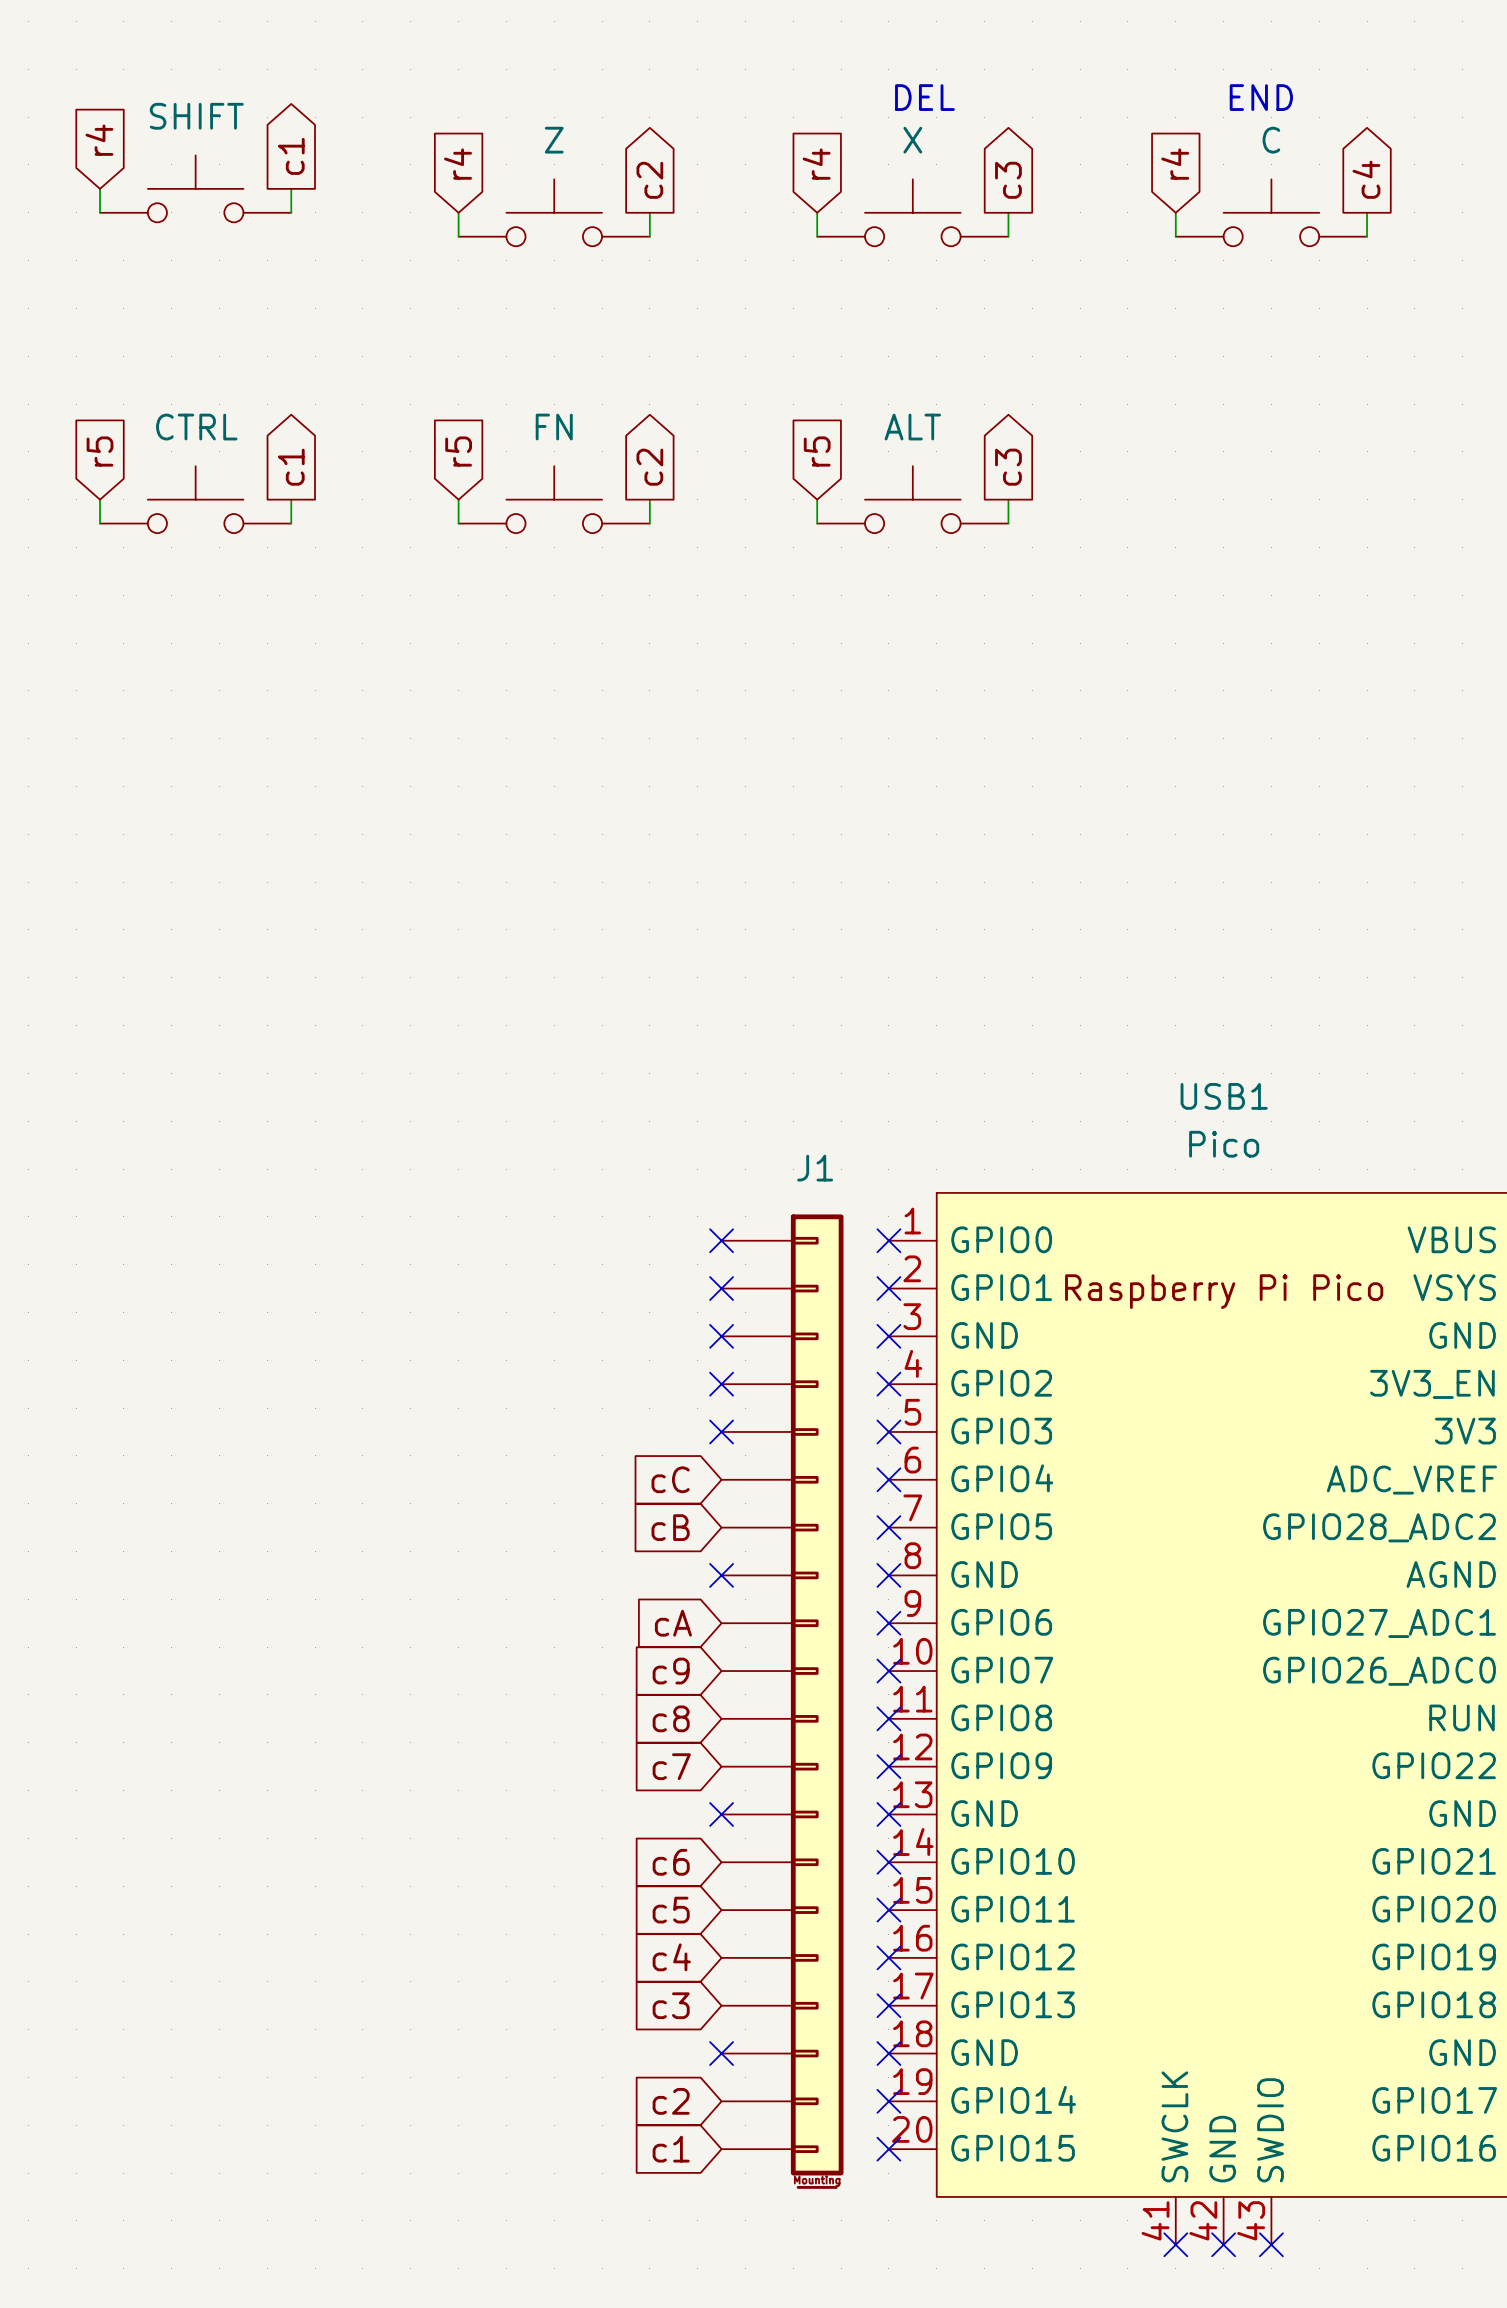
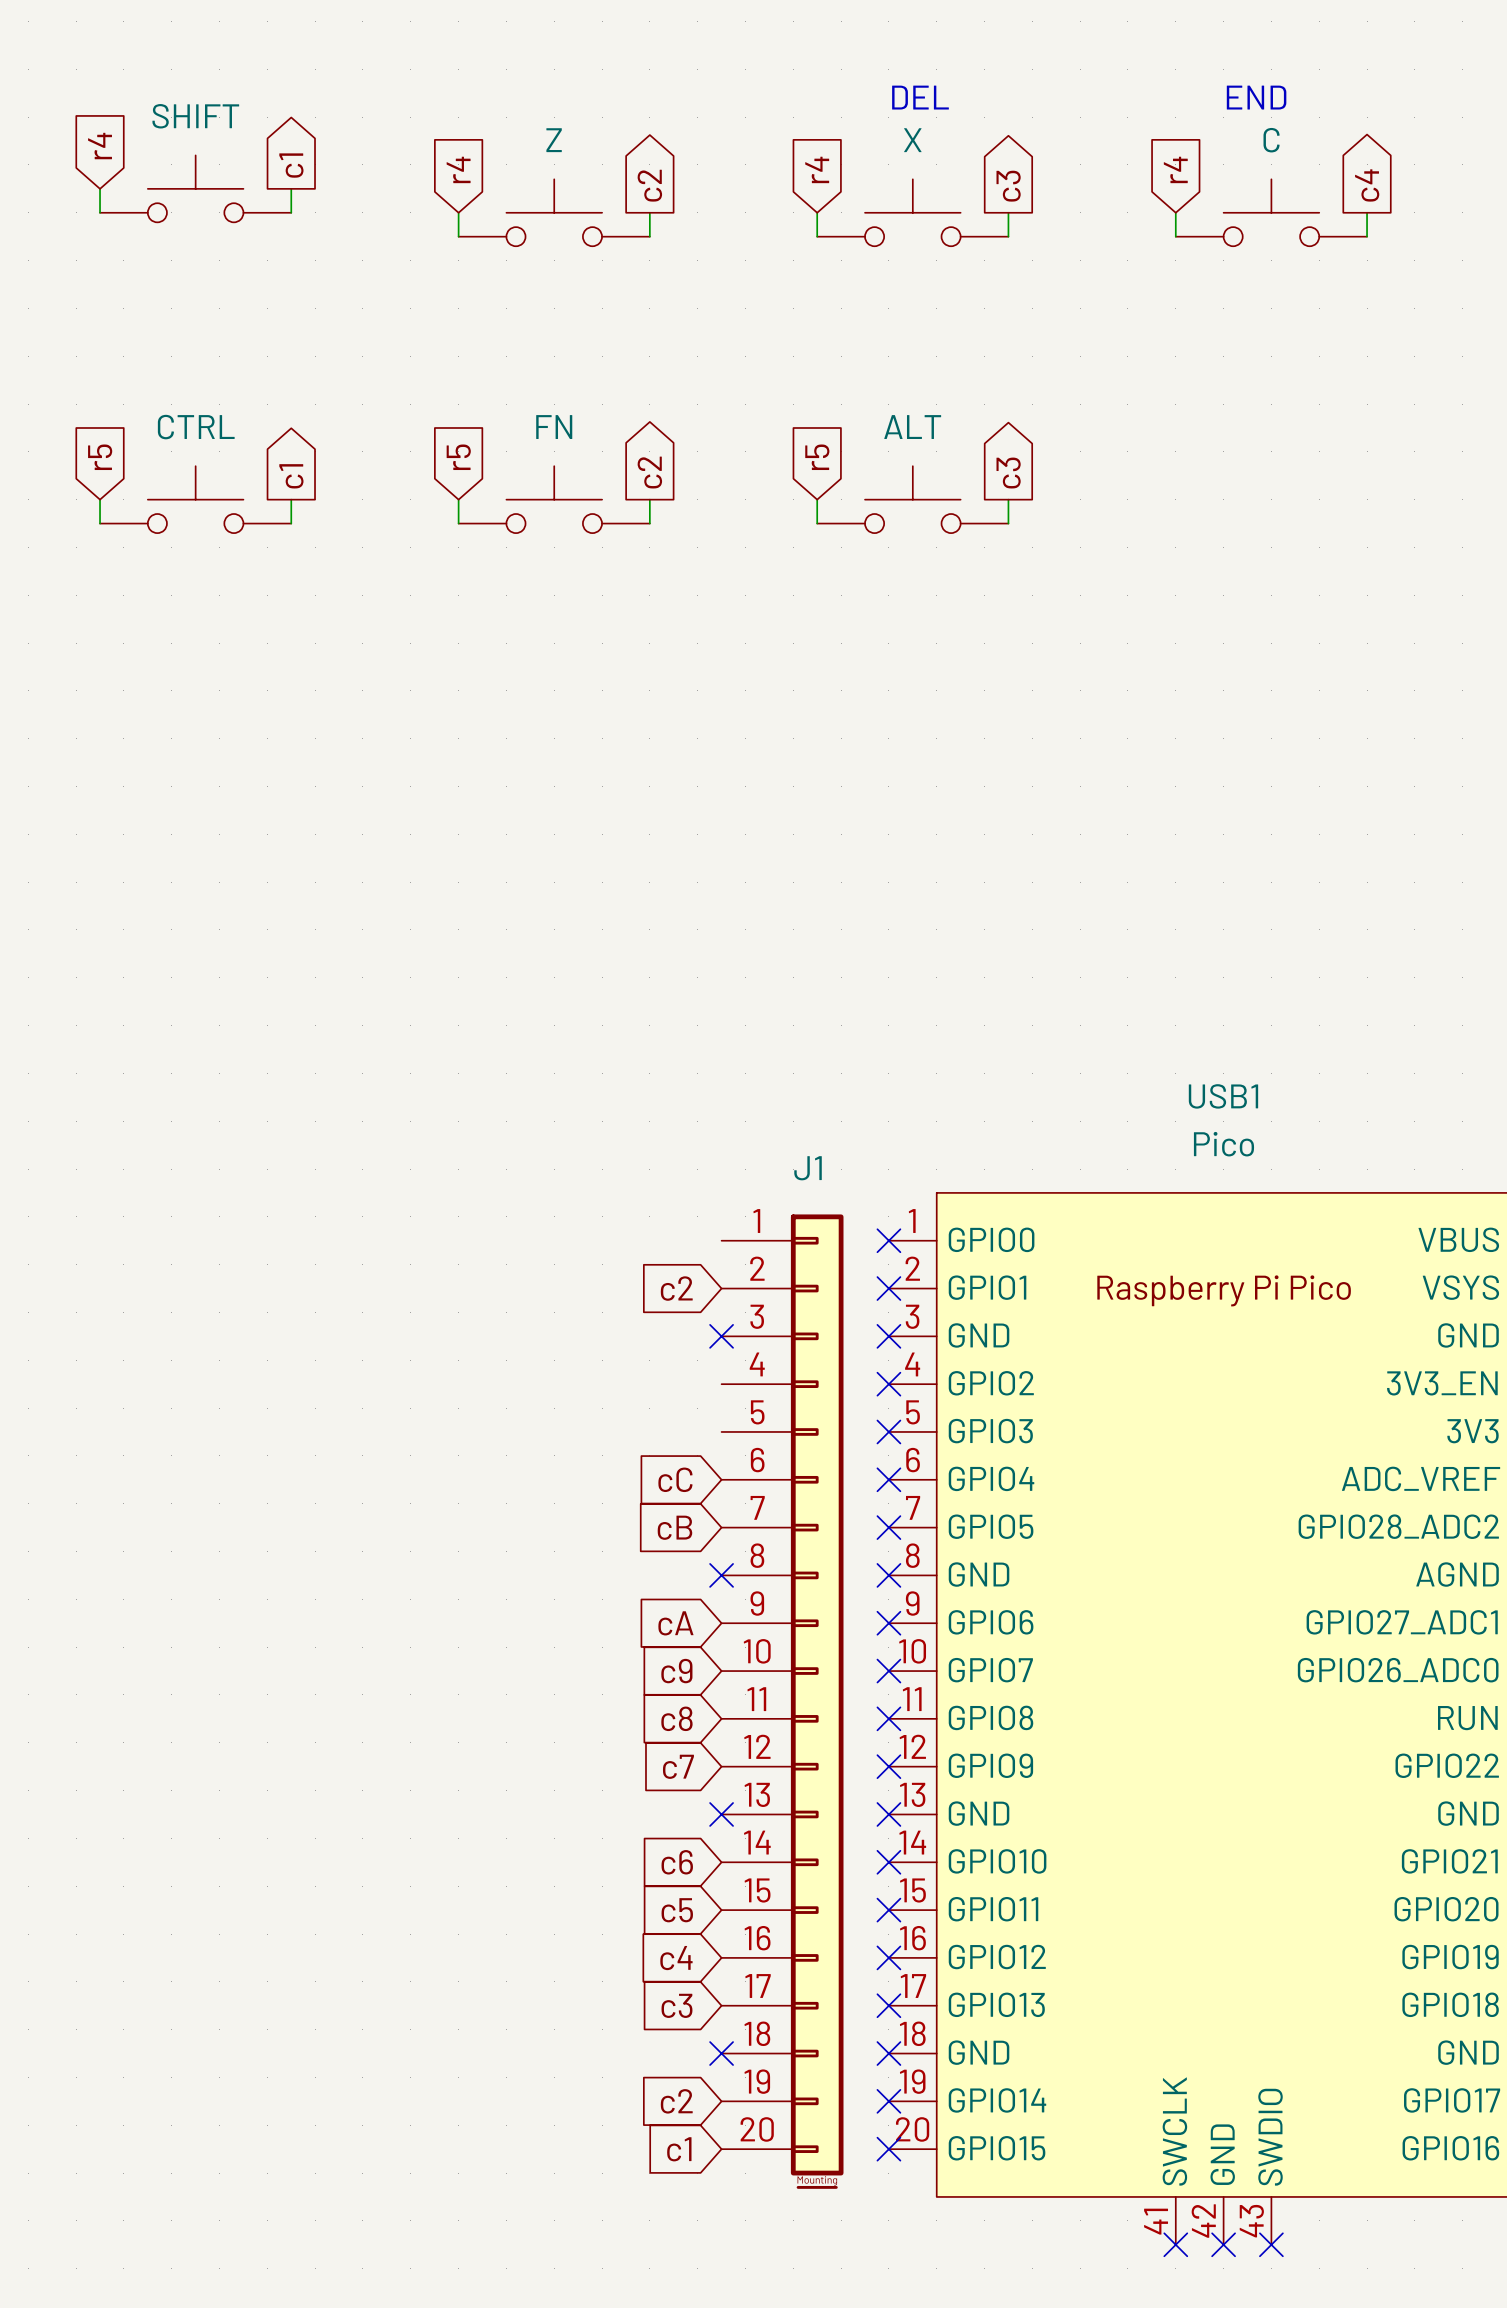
J1 symbol: [721, 1214, 844, 2189] -> [721, 1214, 844, 2189]
no-connect mark: (721, 1240) -> none
global label: none -> c2 (676, 1288)
no-connect mark: (721, 1288) -> none
no-connect mark: (721, 1384) -> none
no-connect mark: (721, 1431) -> none

